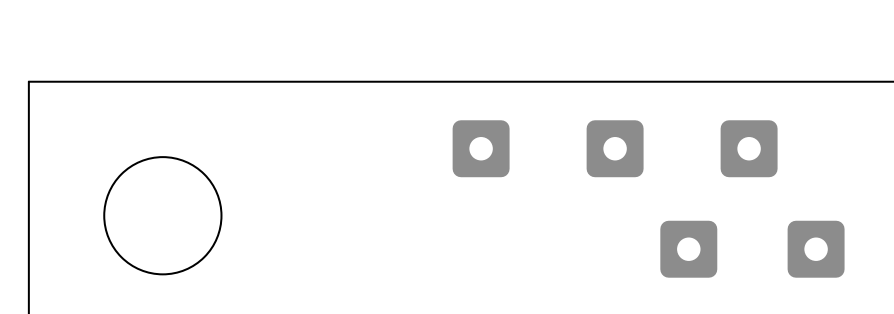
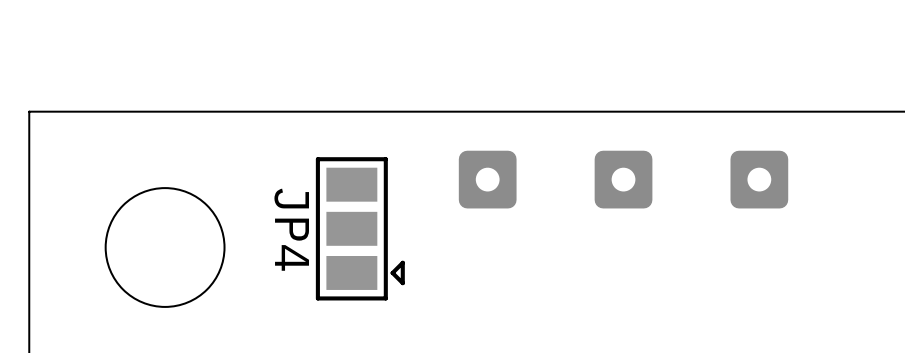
JP4: none -> (360, 228)
part: (688, 249) -> none
part: (816, 249) -> none

